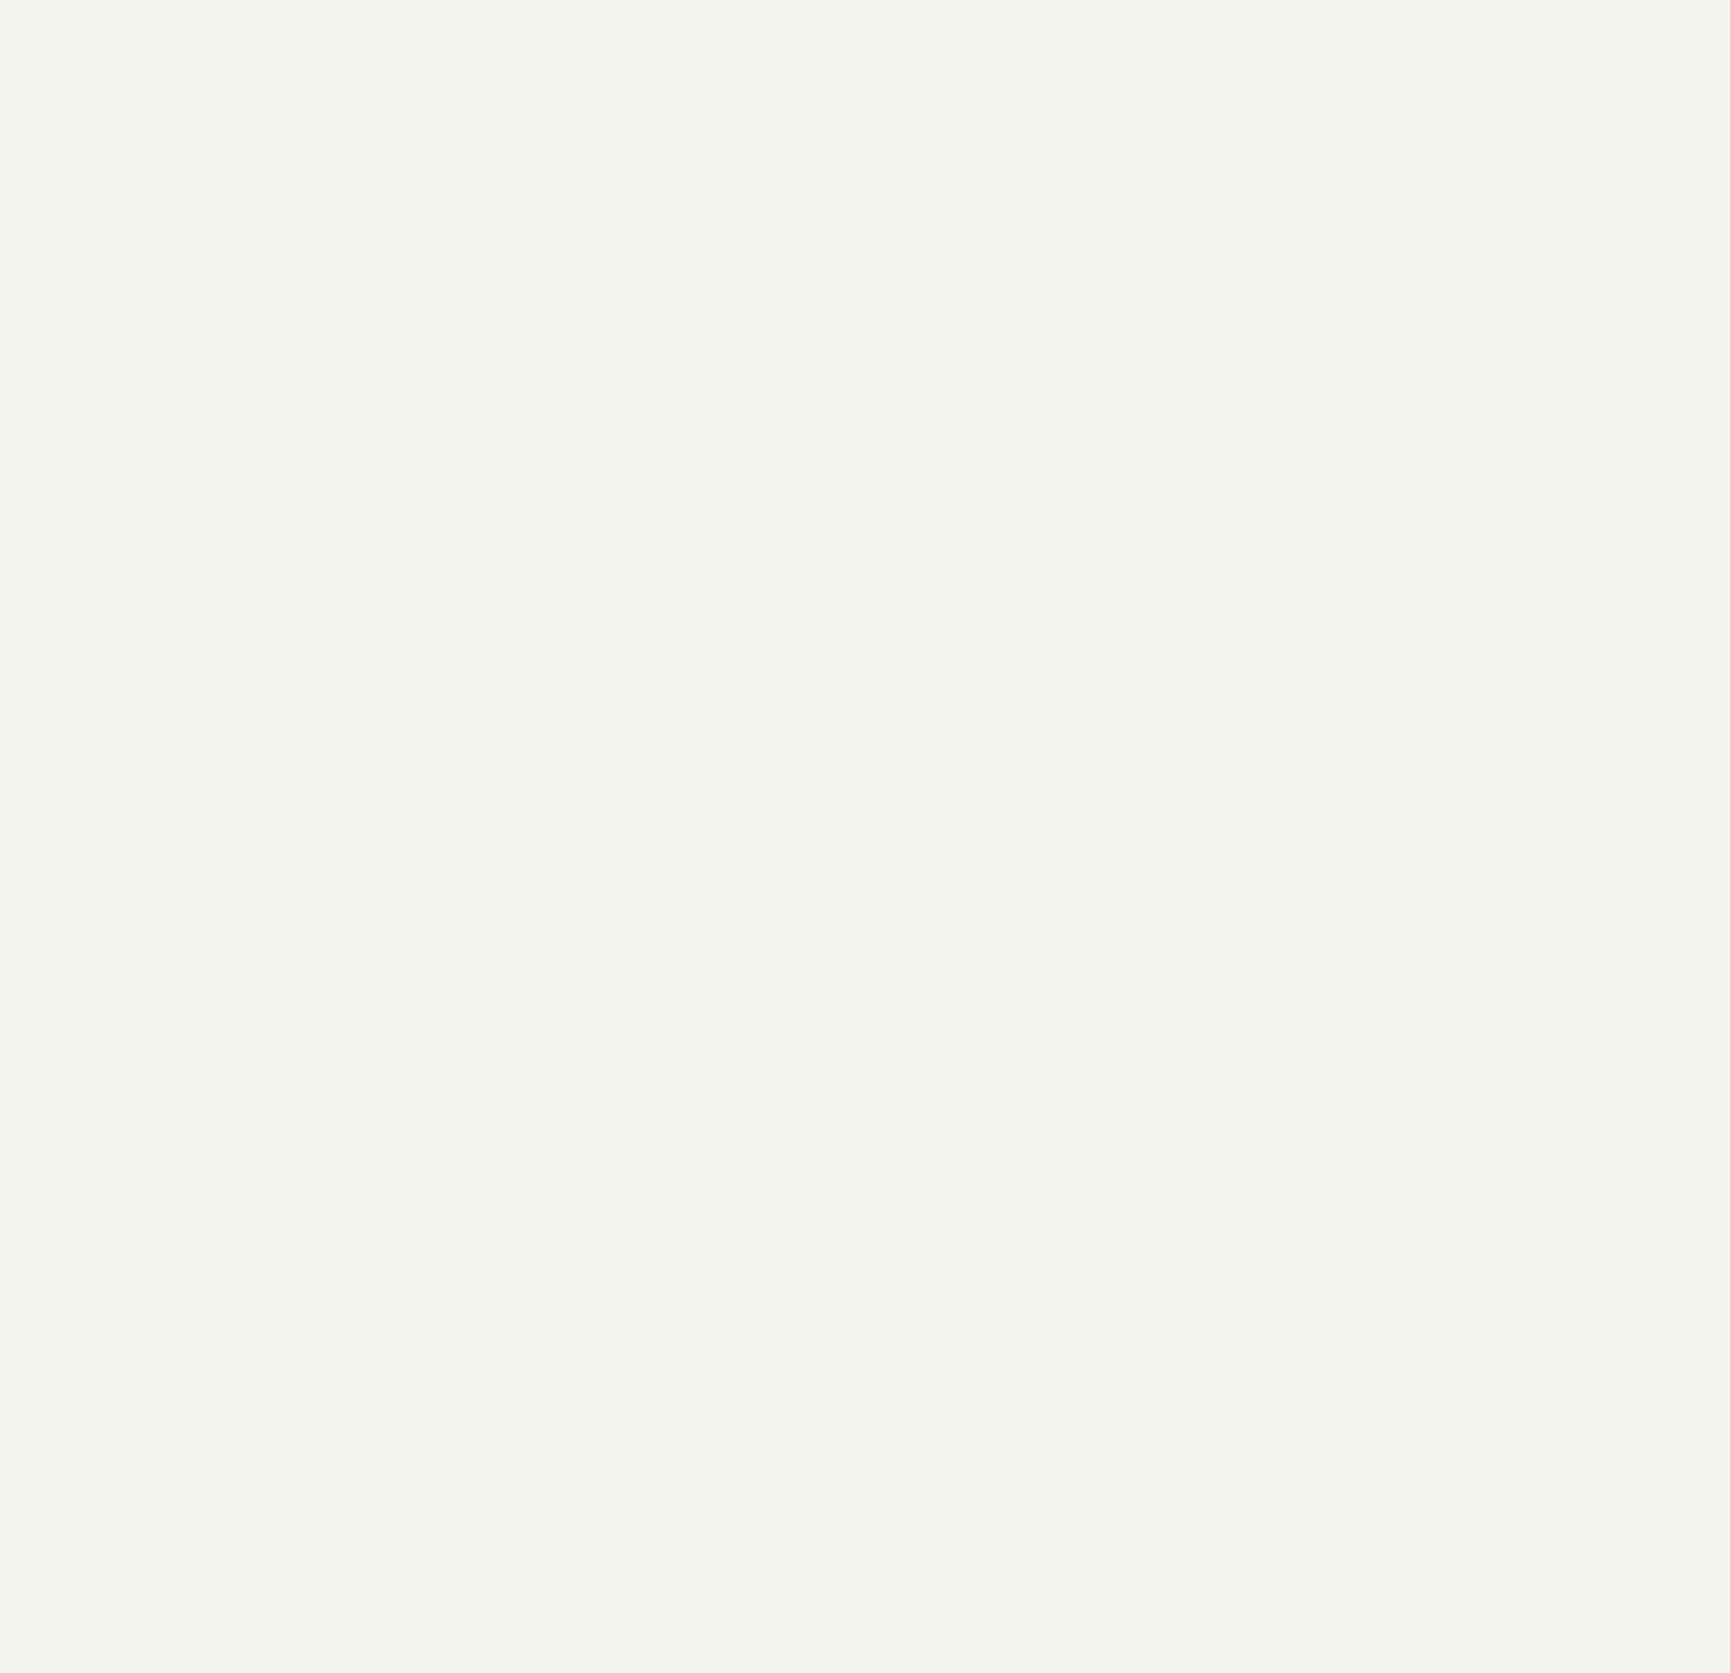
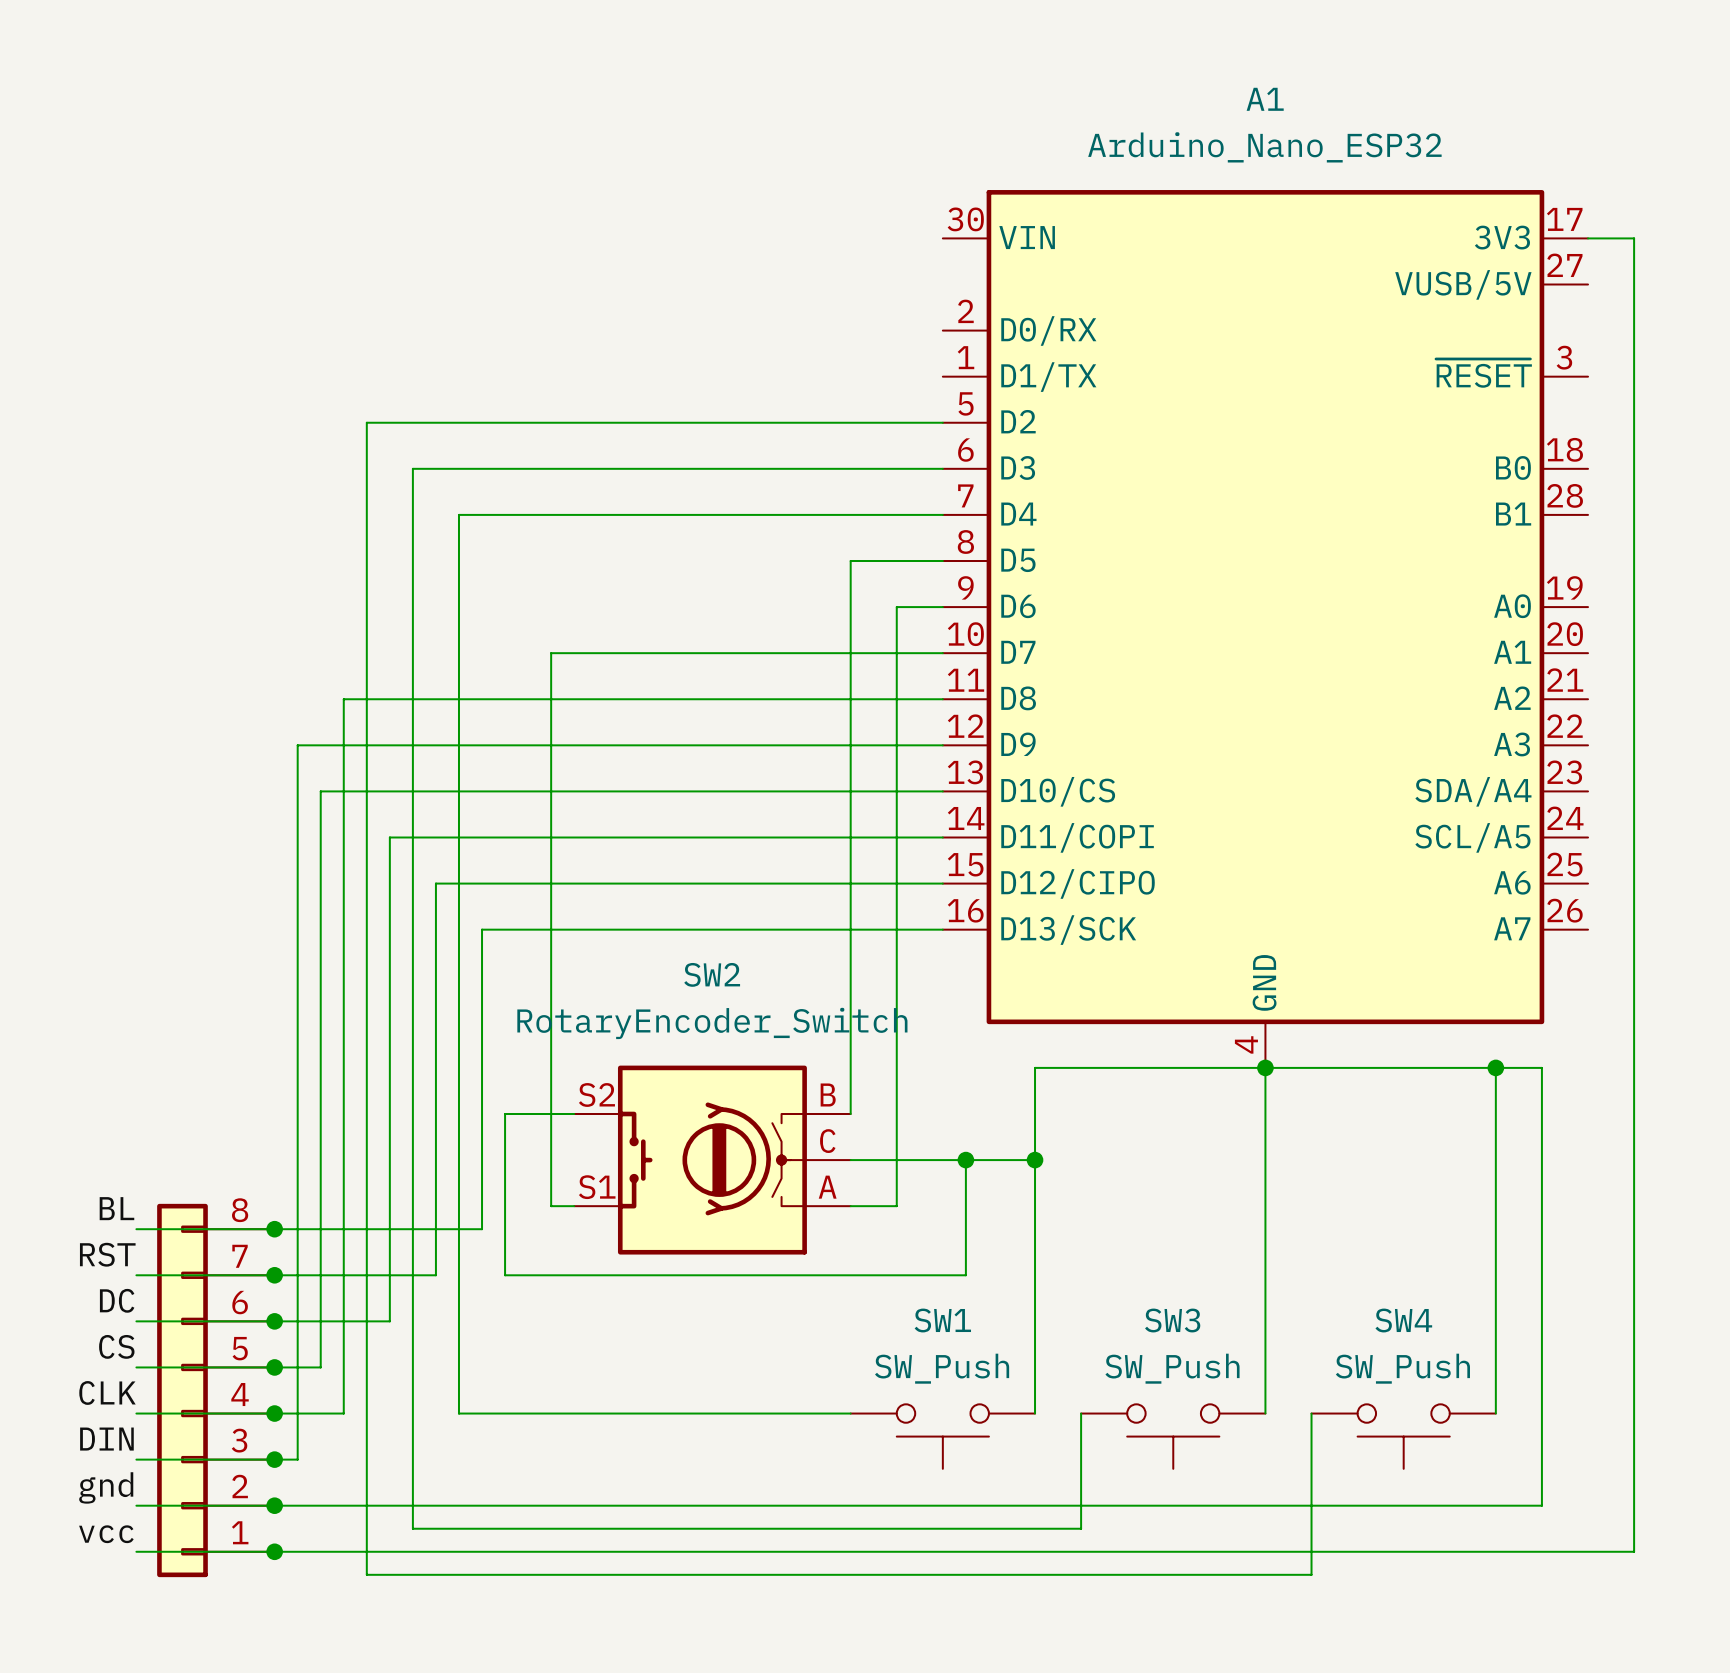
wire: none -> (1588, 238) (1634, 238) (1634, 1551) (136, 1551)
wire: none -> (942, 422) (366, 422) (366, 1574) (1311, 1574) (1311, 1413)
wire: none -> (942, 468) (412, 468) (412, 1528) (1081, 1528) (1081, 1413)
wire: none -> (942, 514) (458, 514) (458, 1413) (850, 1413)
wire: none -> (942, 561) (850, 561) (850, 1113)
wire: none -> (942, 607) (896, 607) (896, 1206) (850, 1206)
A1: none -> Arduino_Nano_ESP32 (1265, 628)
wire: none -> (942, 653) (551, 653) (551, 1206) (574, 1206)
wire: none -> (942, 699) (343, 699) (343, 1413) (136, 1413)
wire: none -> (942, 745) (297, 745) (297, 1459) (136, 1459)
wire: none -> (942, 791) (320, 791) (320, 1367) (136, 1367)
wire: none -> (942, 837) (389, 837) (389, 1321) (136, 1321)
wire: none -> (942, 883) (435, 883) (435, 1275) (136, 1275)
wire: none -> (942, 929) (482, 929) (482, 1229) (136, 1229)
wire: none -> (1265, 1067) (1265, 1413)
junction: none -> (1265, 1067)
wire: none -> (1495, 1067) (1495, 1413)
junction: none -> (1495, 1067)
wire: none -> (574, 1113) (505, 1113) (505, 1275) (965, 1275) (965, 1160)
SW2: none -> RotaryEncoder_Switch (712, 1160)
wire: none -> (850, 1160) (1035, 1160)
junction: none -> (965, 1160)
junction: none -> (1035, 1160)
label: none -> BL (116, 1208)
junction: none -> (274, 1229)
label: none -> RST (107, 1254)
junction: none -> (274, 1275)
label: none -> DC (117, 1300)
junction: none -> (274, 1321)
label: none -> CS (116, 1346)
junction: none -> (274, 1367)
part: none -> (215, 1390)
label: none -> CLK (107, 1392)
junction: none -> (274, 1413)
wire: none -> (1035, 1413) (1035, 1067) (1541, 1067) (1541, 1505) (136, 1505)
SW1: none -> SW_Push (942, 1436)
SW3: none -> SW_Push (1173, 1436)
SW4: none -> SW_Push (1403, 1436)
label: none -> DIN (106, 1439)
junction: none -> (274, 1459)
label: none -> gnd (106, 1487)
junction: none -> (274, 1505)
label: none -> vcc (106, 1534)
junction: none -> (274, 1551)

